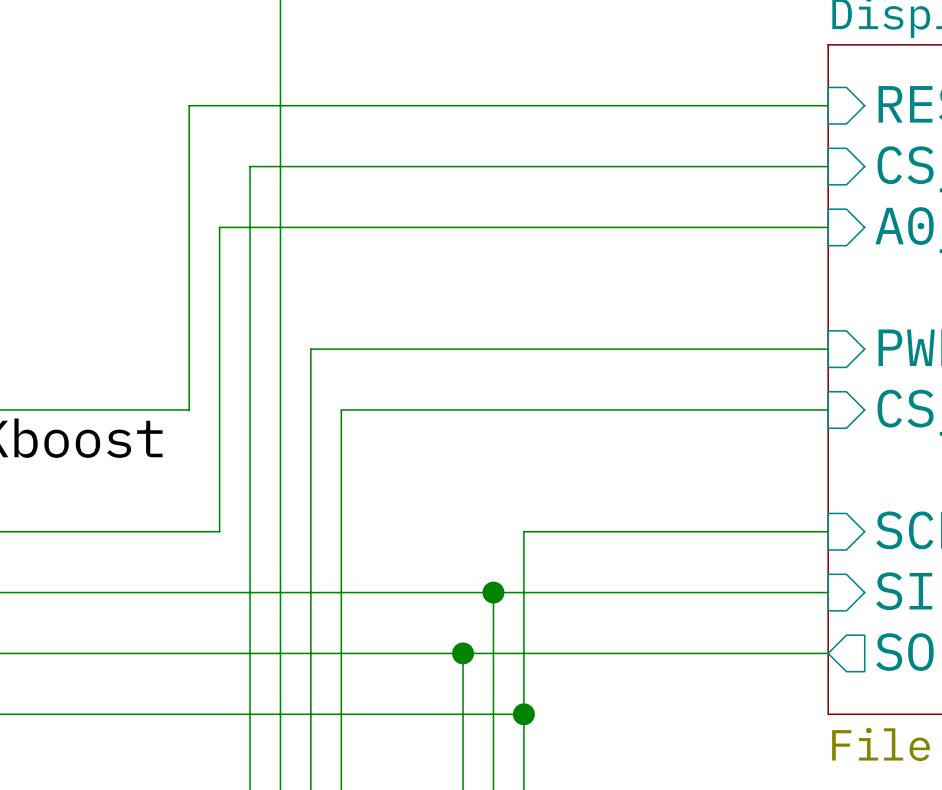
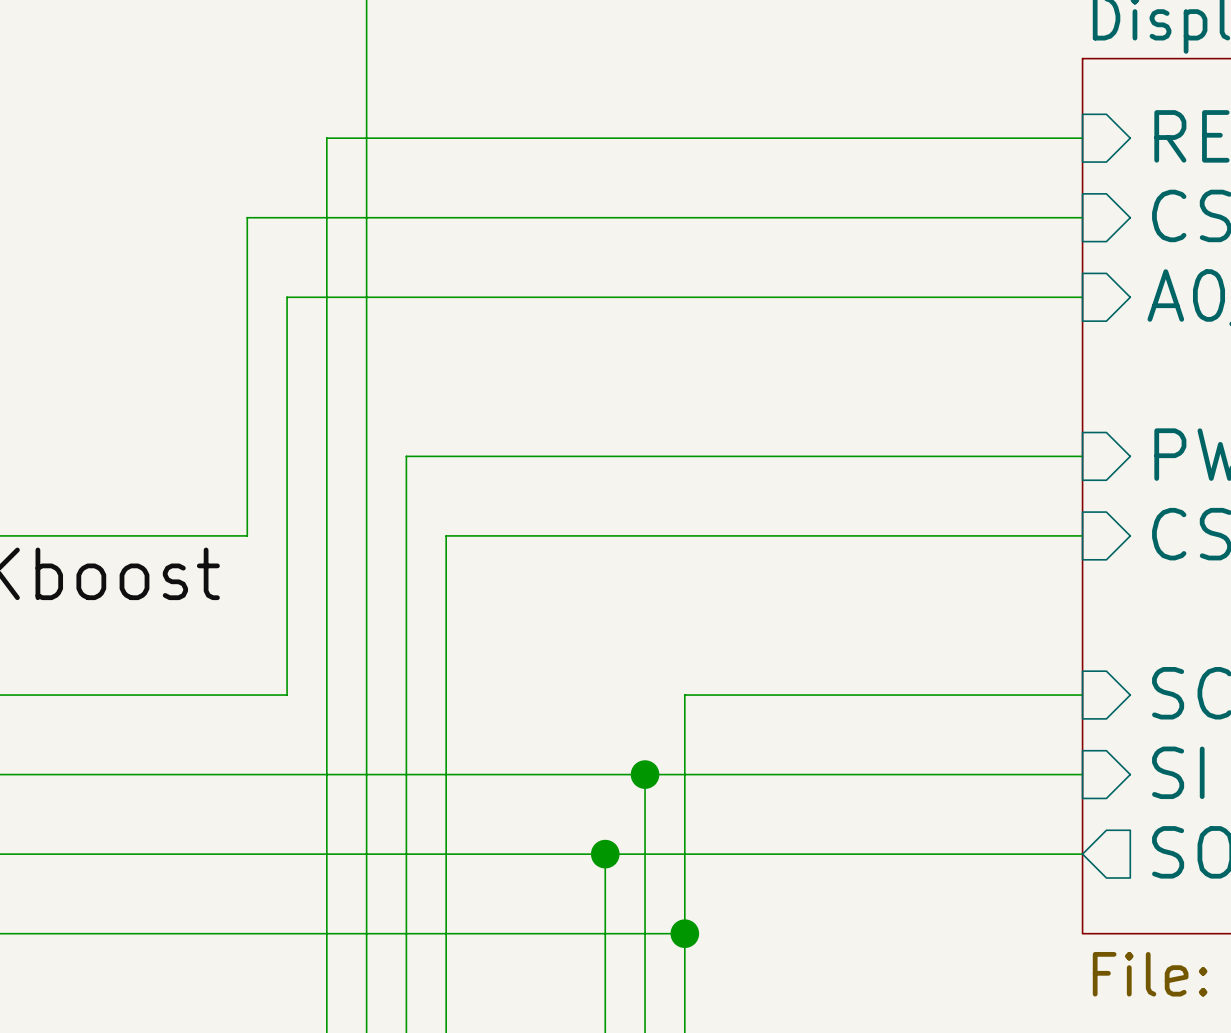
wire: (250, 105) (189, 105) (189, 166) -> (326, 138) (326, 217) (247, 217)

